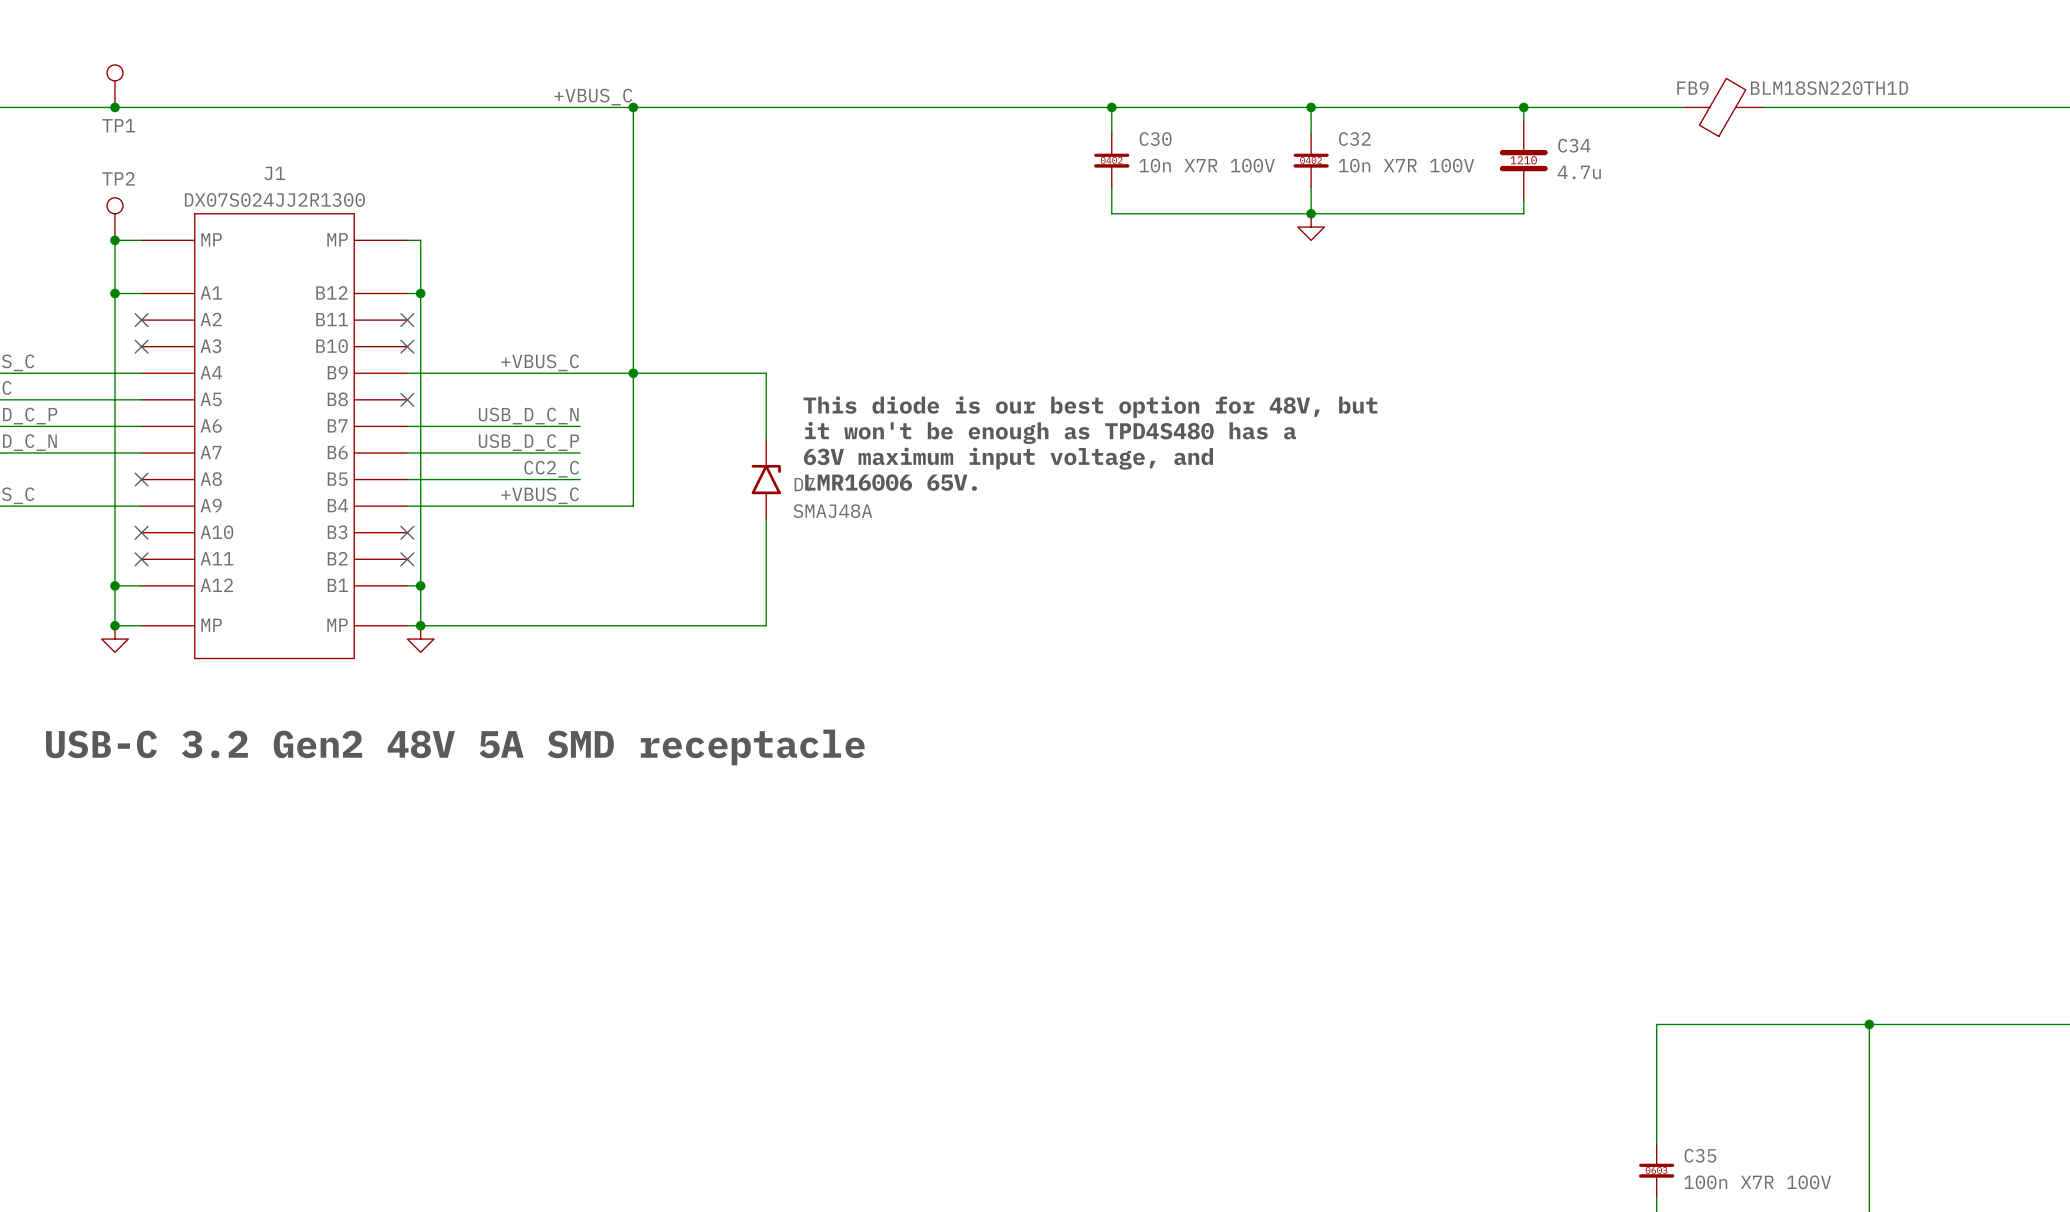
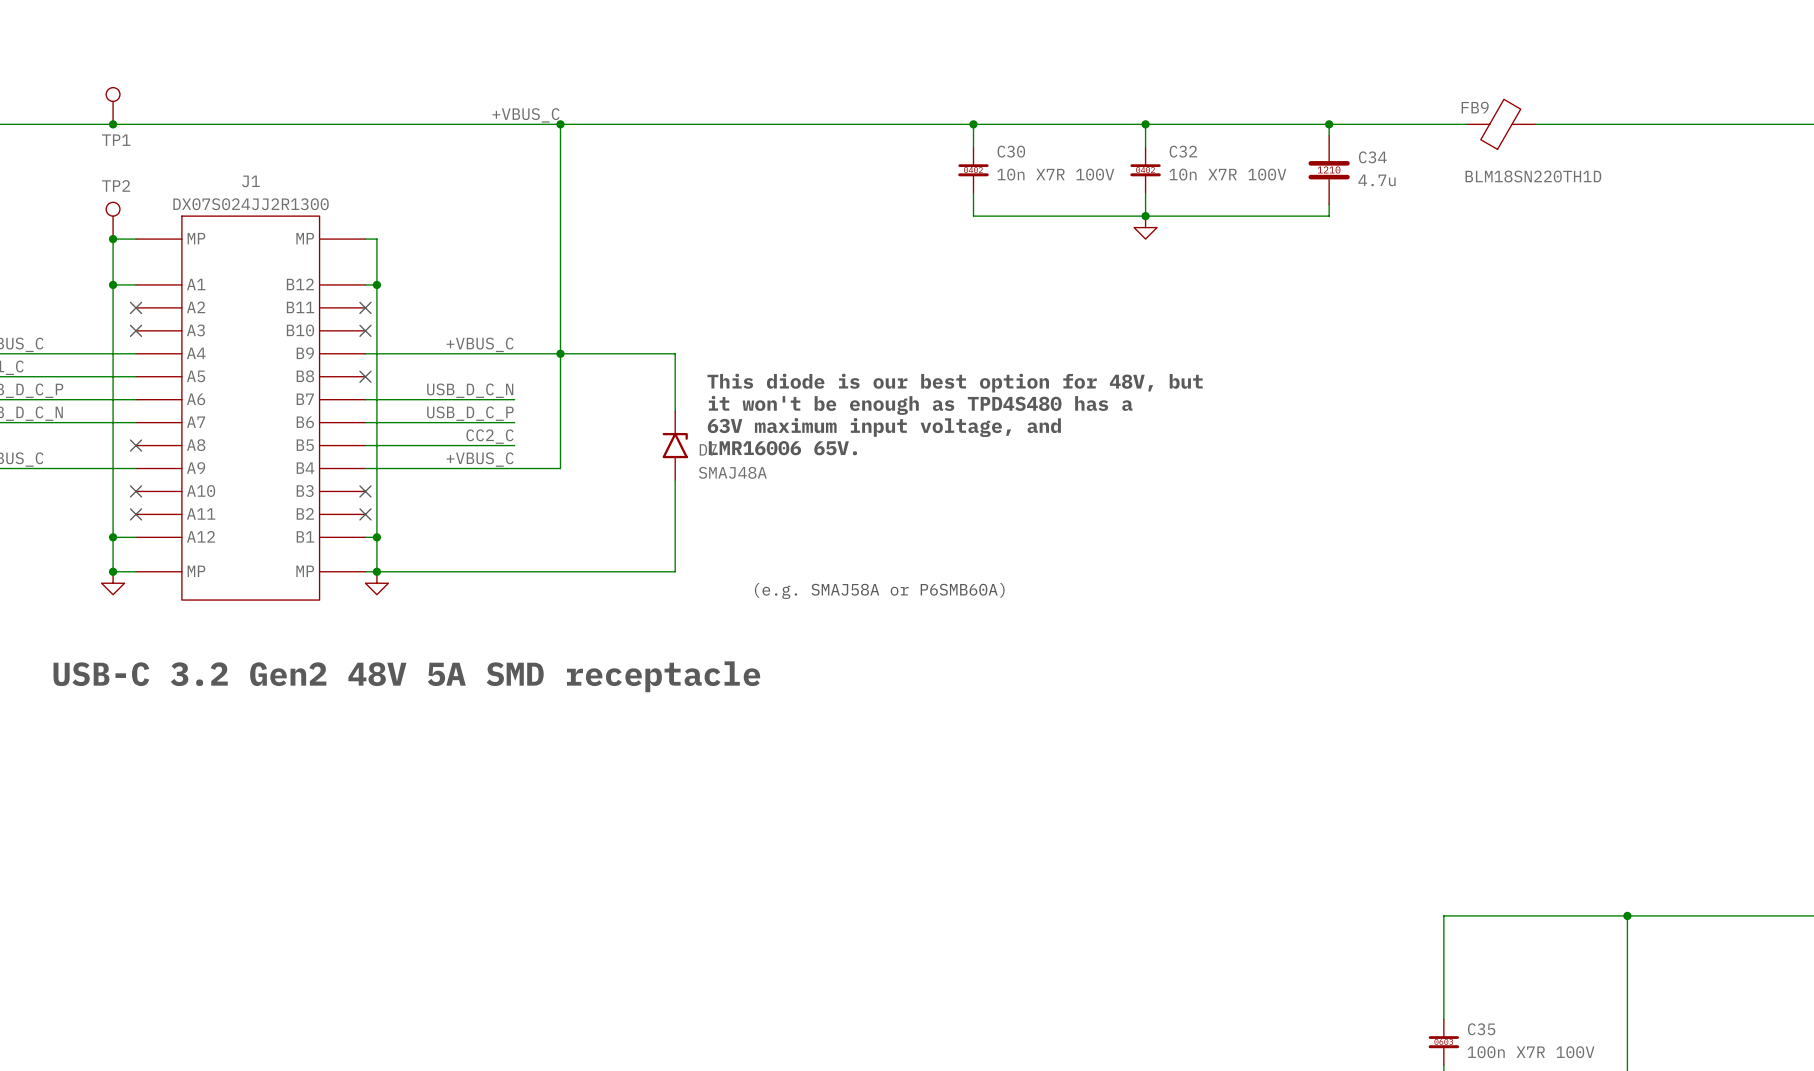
FB9 value position: BLM18SN220TH1D (1829, 88) -> BLM18SN220TH1D (1533, 176)
text: none -> (e.g. SMAJ58A or P6SMB60A) (879, 590)

